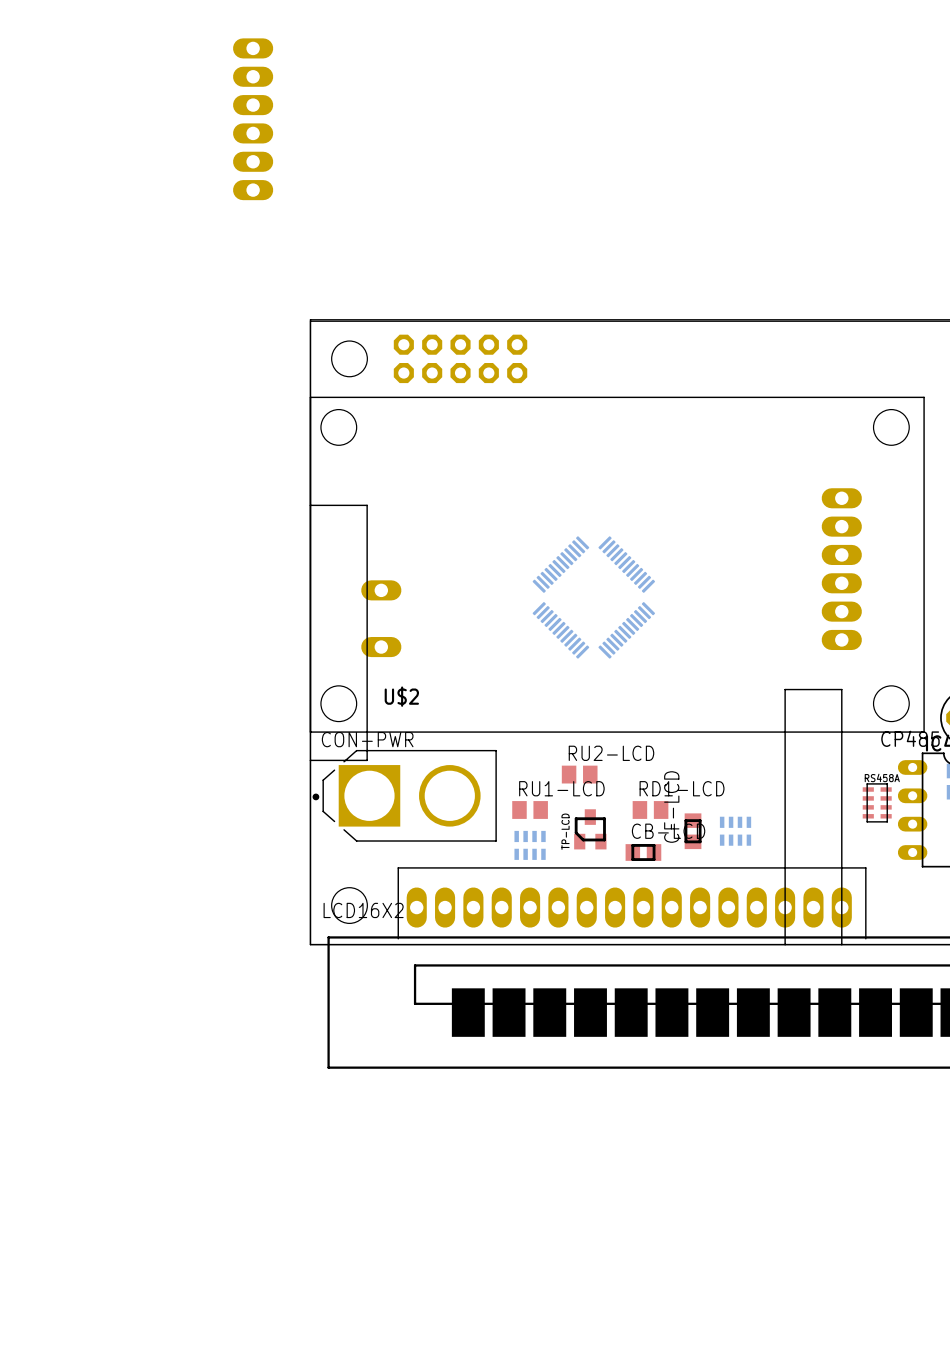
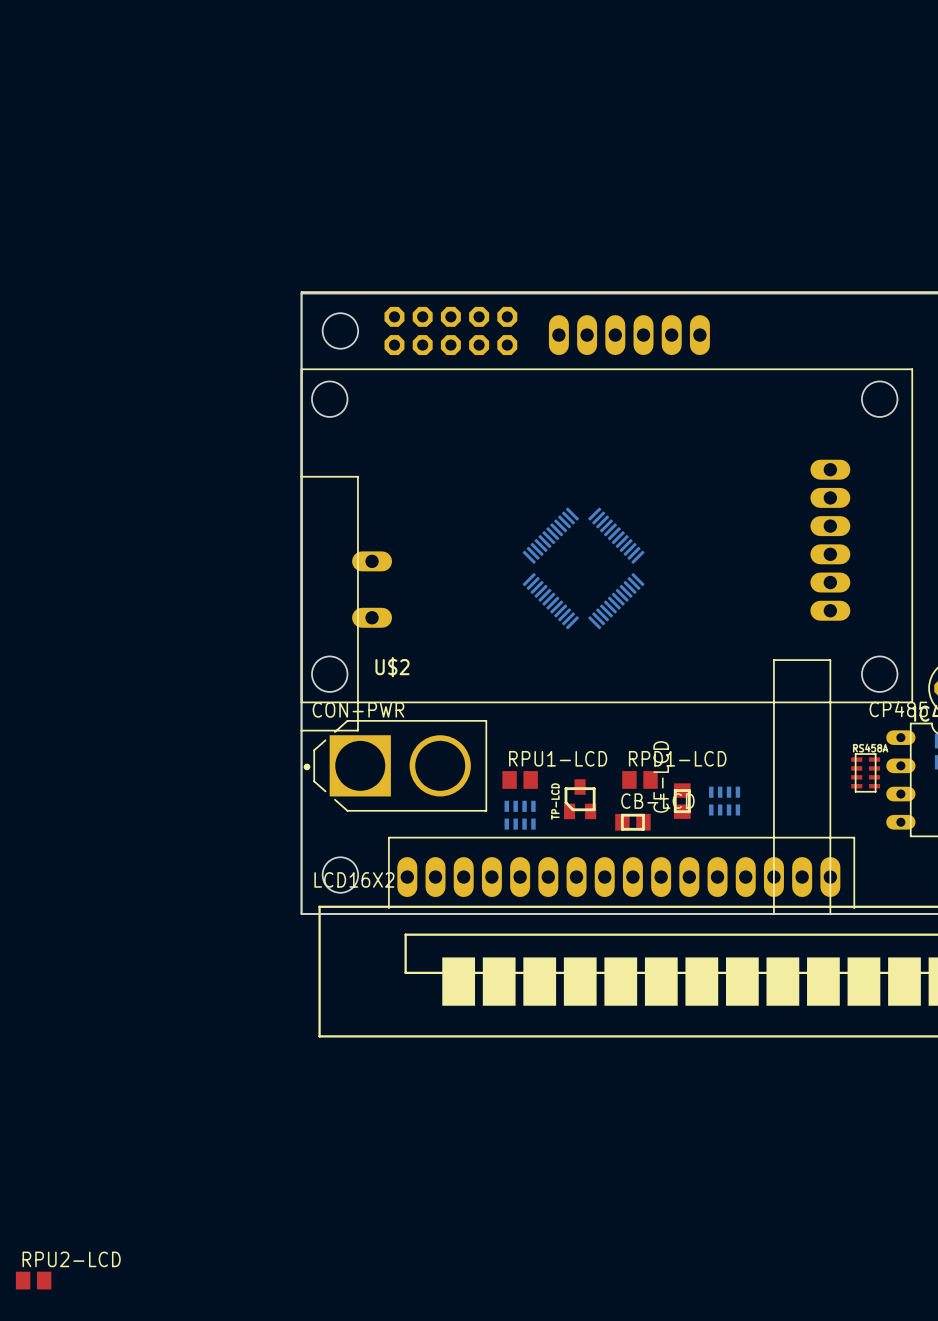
part: (253, 119) -> none
part: none -> (629, 335)
RU2-LCD: (579, 774) -> none
RU1-LCD name: RU1-LCD (561, 788) -> RPU1-LCD (558, 758)
RD1-LCD name: RD1-LCD (682, 788) -> RPD1-LCD (677, 758)
RPU2-LCD: none -> (33, 1280)

